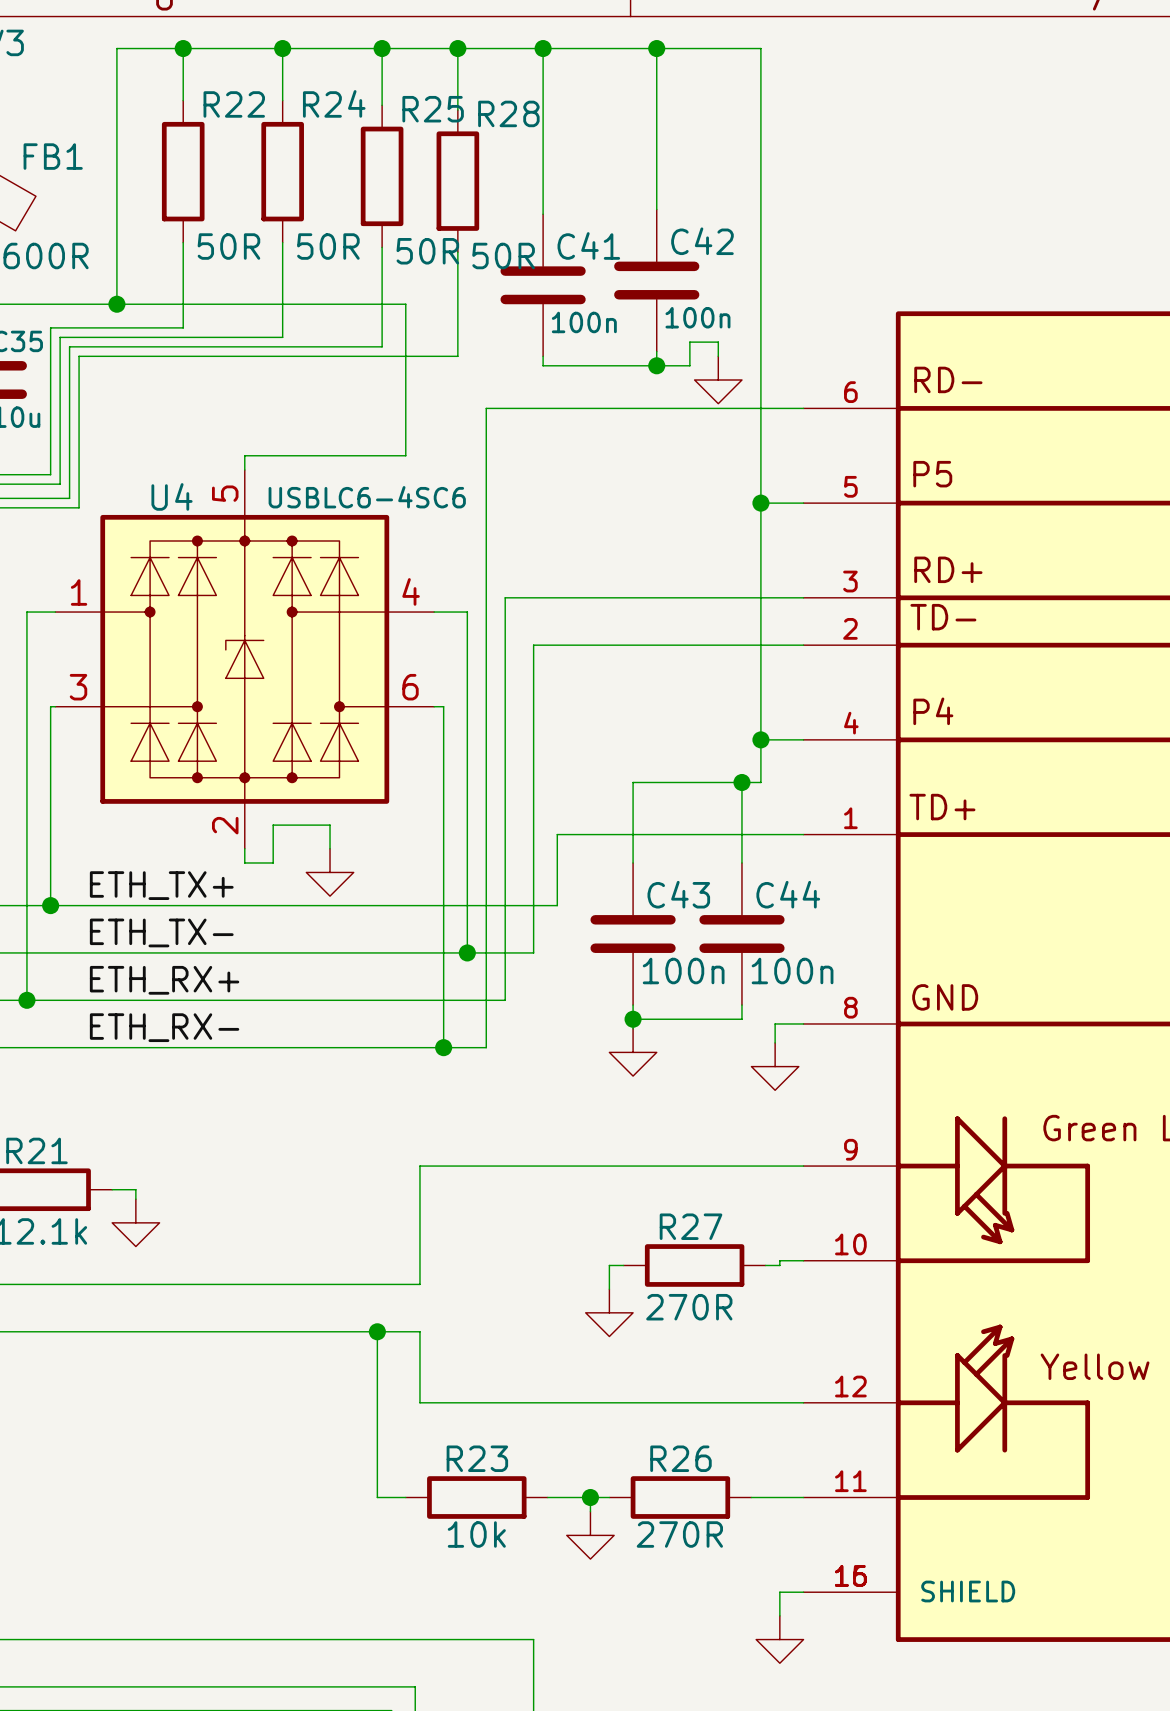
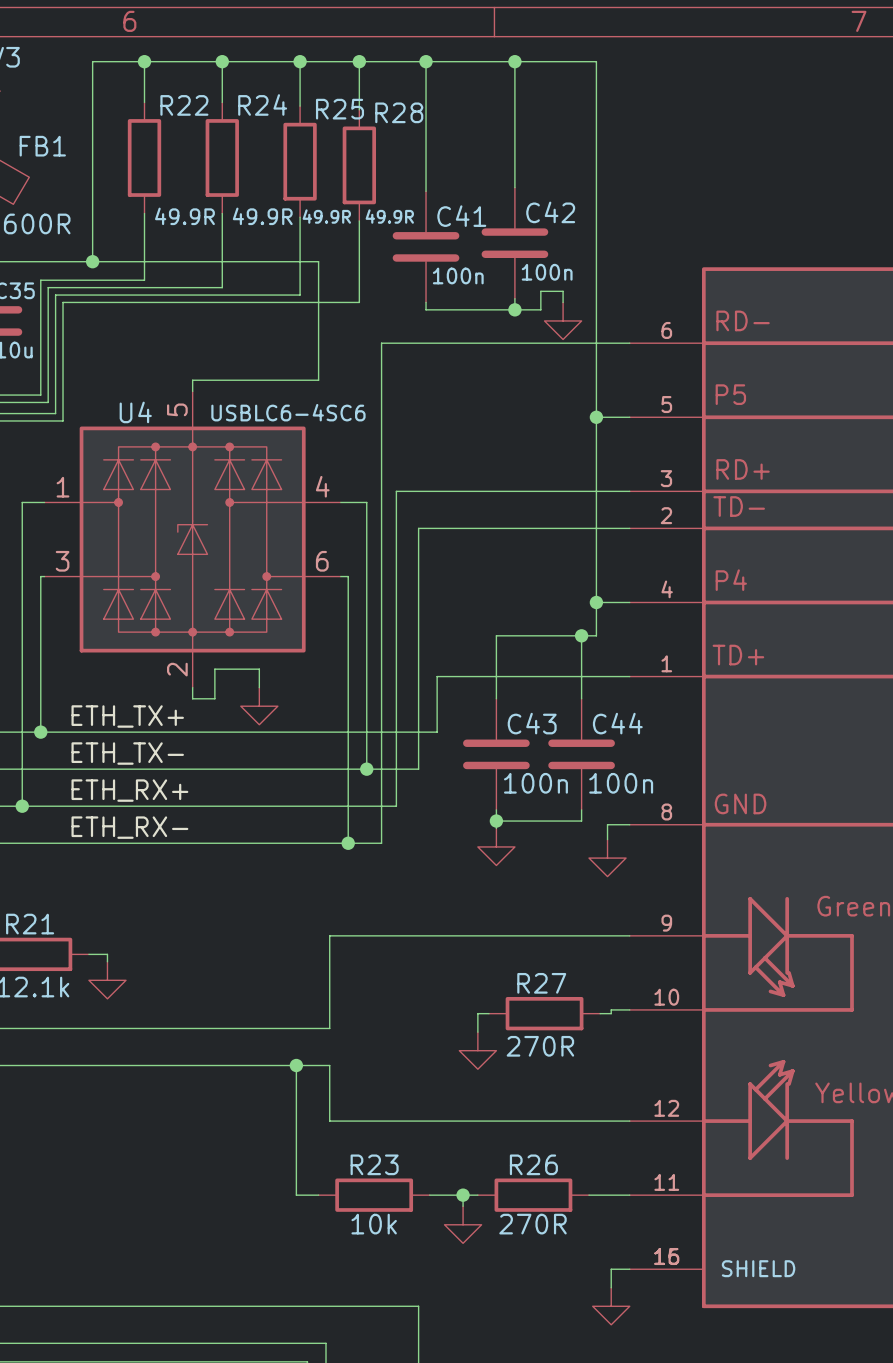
R22 value: 50R (228, 246) -> 49.9R (184, 216)
R24 value: 50R (328, 246) -> 49.9R (262, 216)
R25 value: 50R (427, 251) -> 49.9R (326, 216)
R28 value: 50R (503, 255) -> 49.9R (389, 216)

